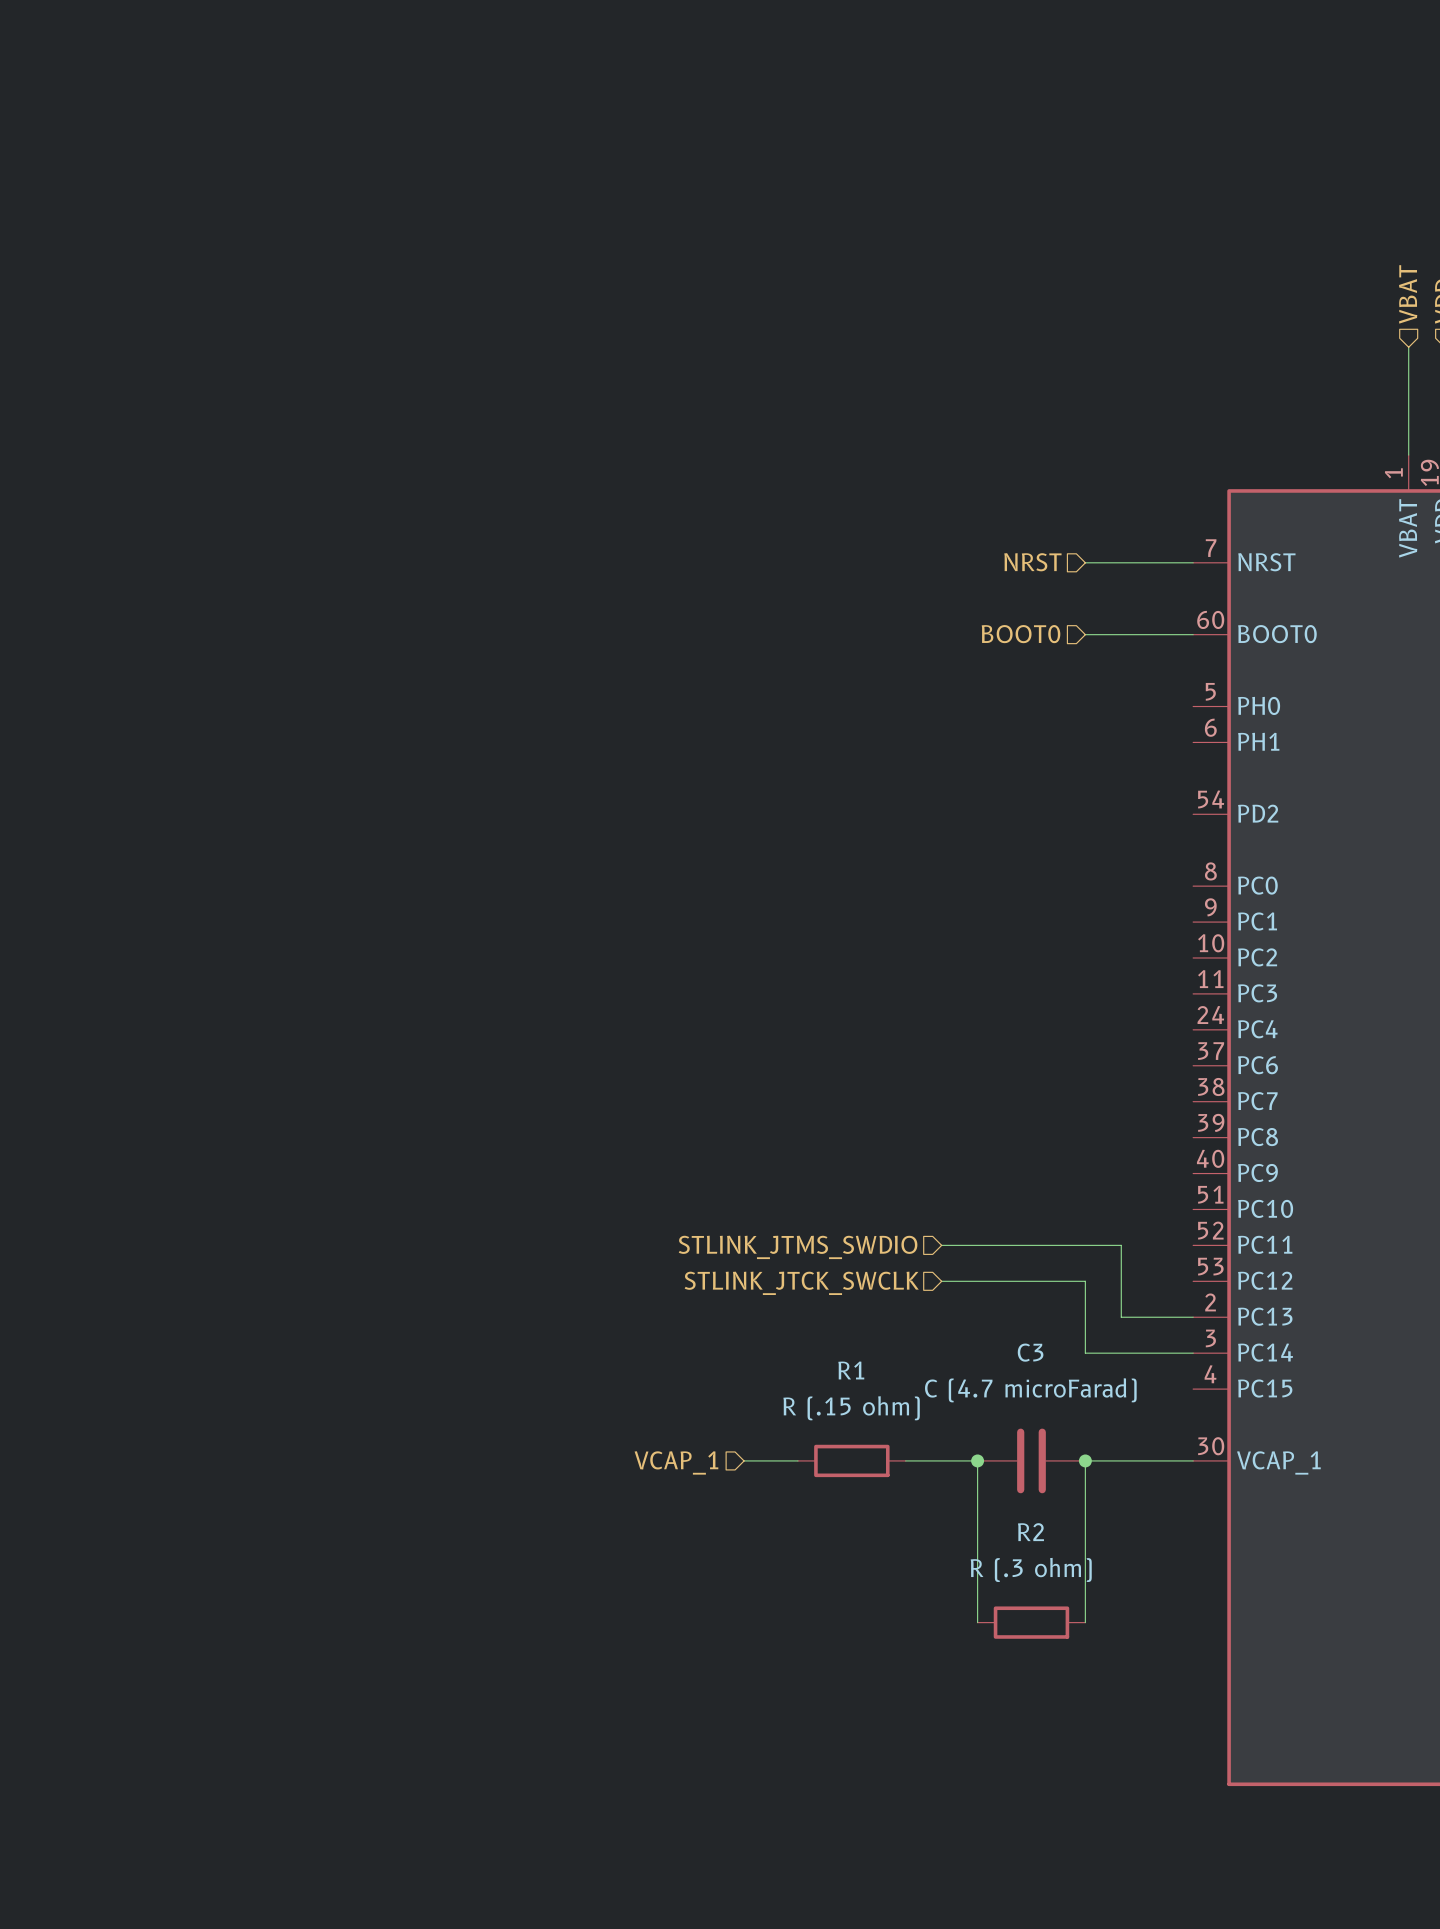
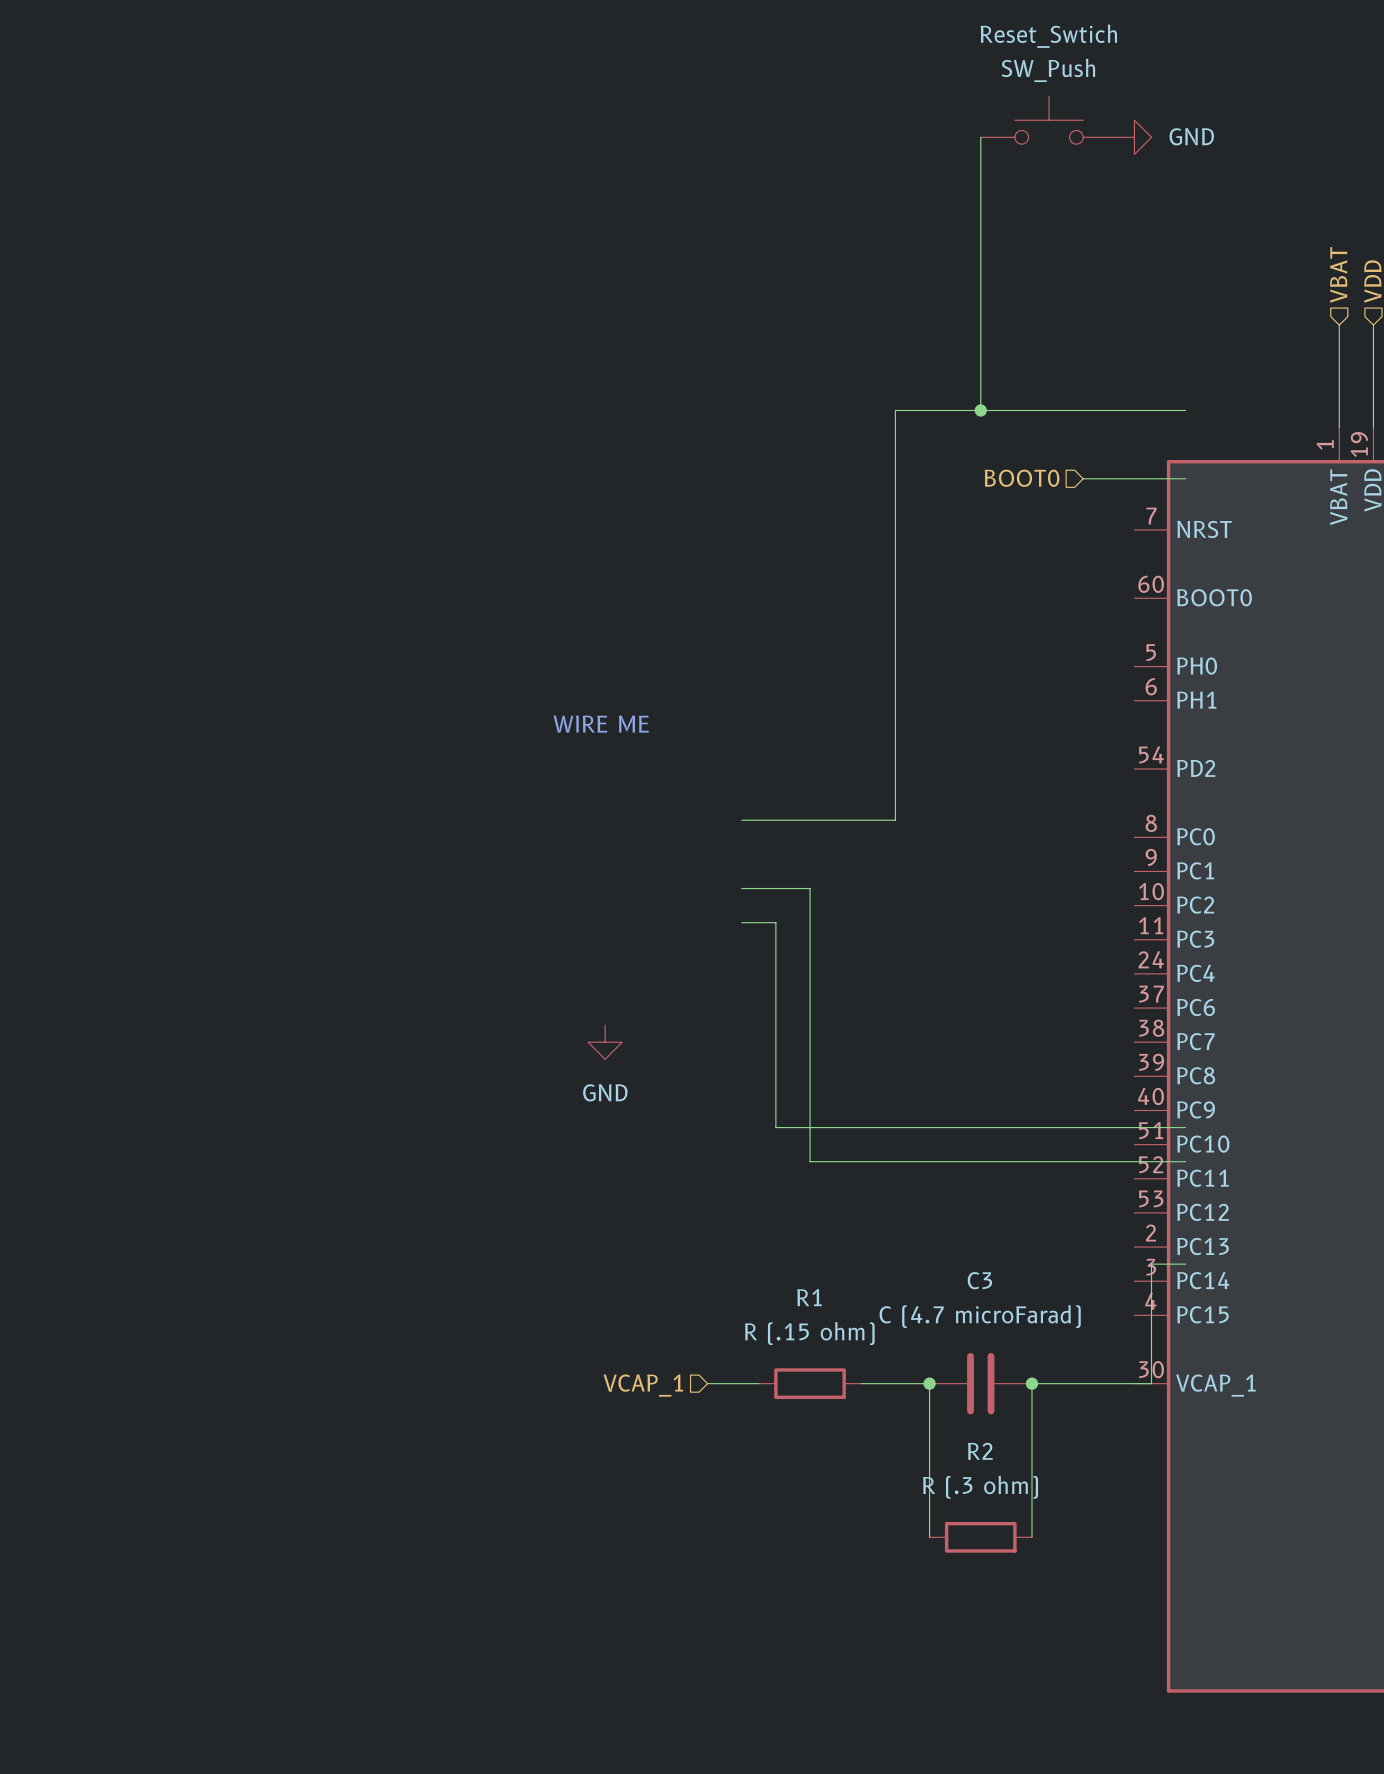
Reset_Swtich: none -> SW_Push (1049, 120)
wire: none -> (980, 137) (980, 410)
power symbol: none -> GND (1134, 137)
junction: none -> (980, 410)
wire: none -> (1185, 410) (895, 410) (895, 820) (741, 820)
hierarchical label: NRST (1032, 562) -> none
wire: (1085, 562) (1193, 562) -> none
hierarchical label position: BOOT0 (1021, 634) -> BOOT0 (1022, 478)
wire: (1085, 634) (1193, 634) -> (1083, 478) (1185, 478)
text: none -> WIRE ME (601, 724)
wire: none -> (741, 888) (810, 888) (810, 1161) (1185, 1161)
wire: none -> (741, 922) (775, 922) (775, 1127) (1185, 1127)
power symbol: none -> GND (605, 1042)
wire: (941, 1245) (1121, 1245) (1121, 1317) (1193, 1317) -> none
hierarchical label: STLINK_JTMS_SWDIO (798, 1247) -> none
wire: (941, 1281) (1085, 1281) (1085, 1353) (1193, 1353) -> none
hierarchical label: STLINK_JTCK_SWCLK (801, 1283) -> none
wire: none -> (1185, 1264) (1151, 1264) (1151, 1383) (1134, 1383)

